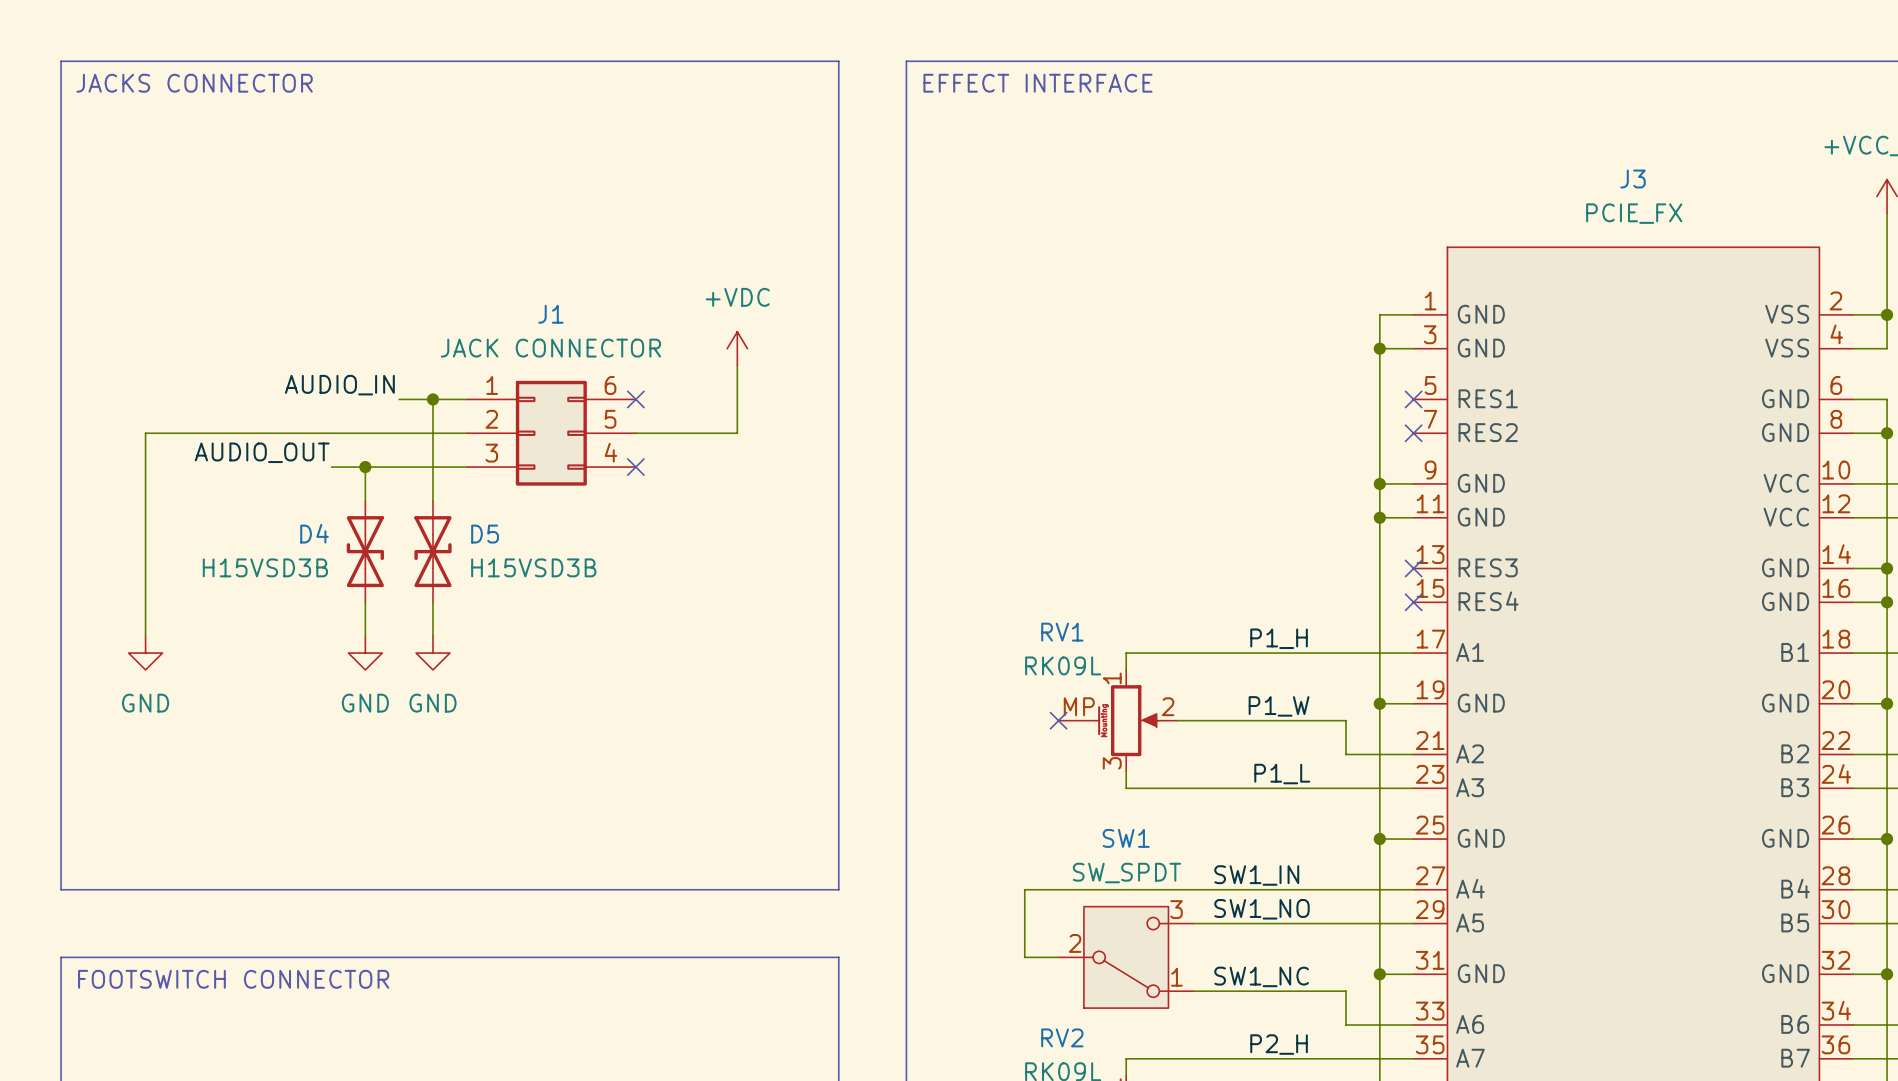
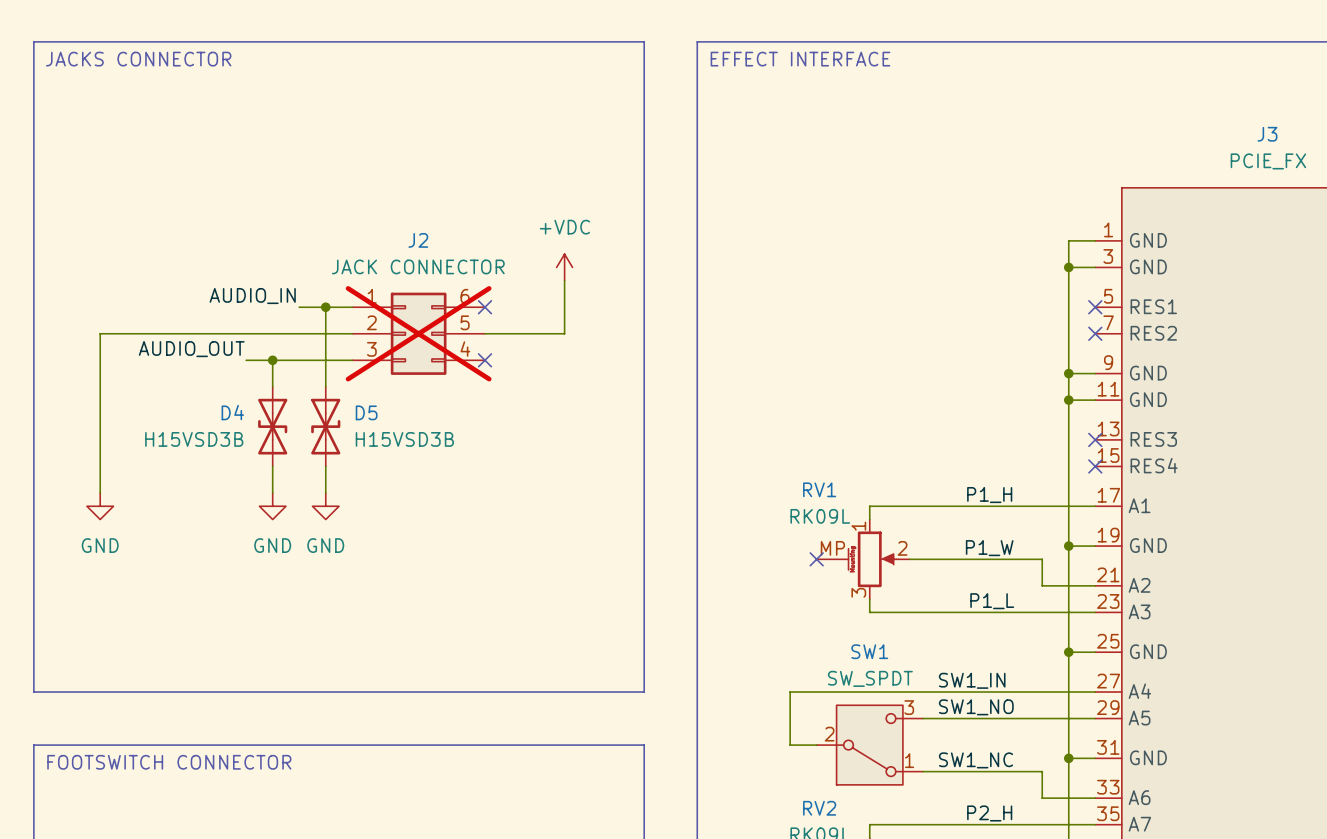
J1 name: J1 (550, 314) -> J2 (418, 240)
J1 do-not-place cross: none -> (418, 333)

